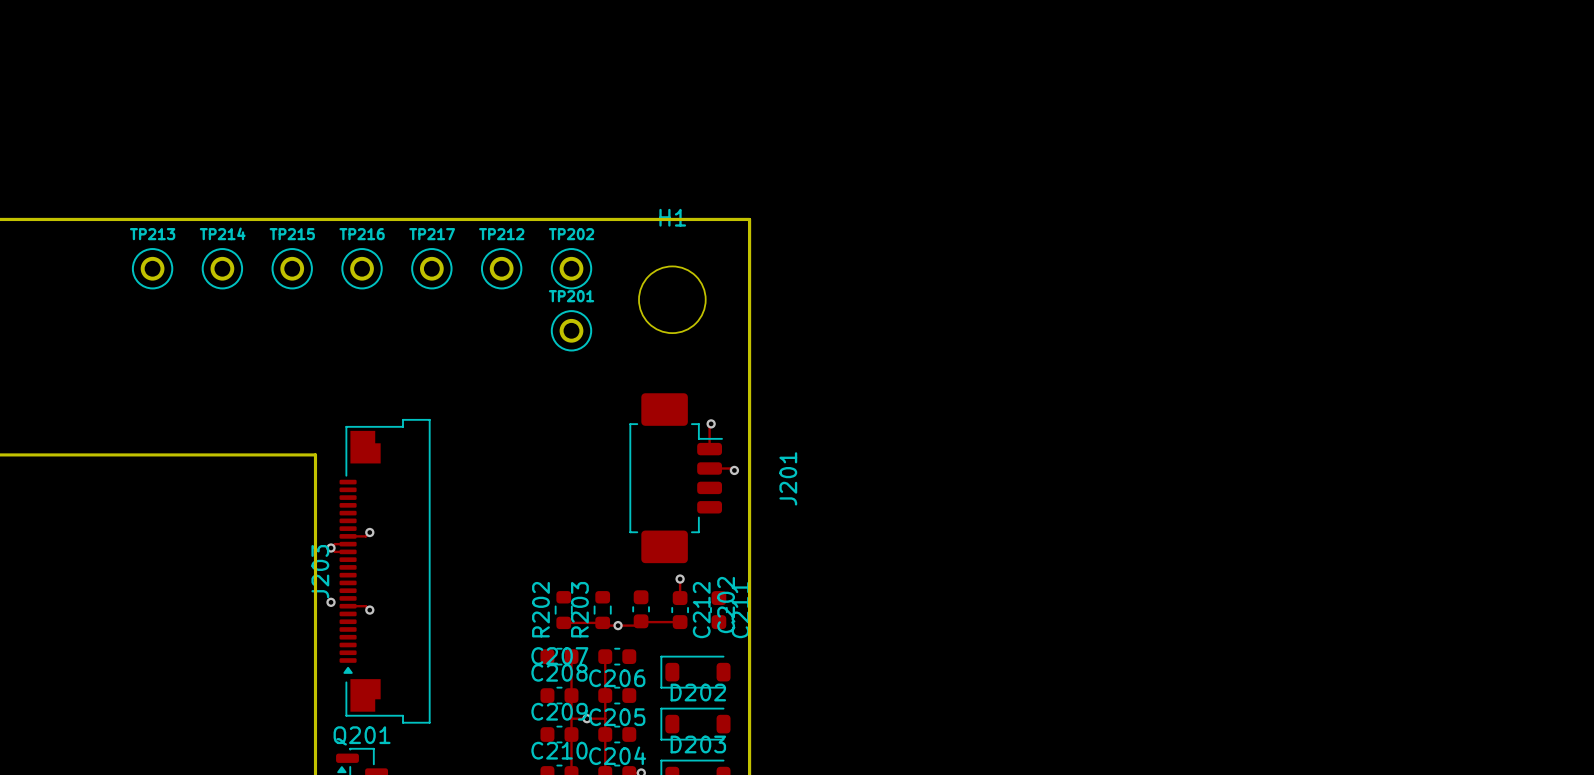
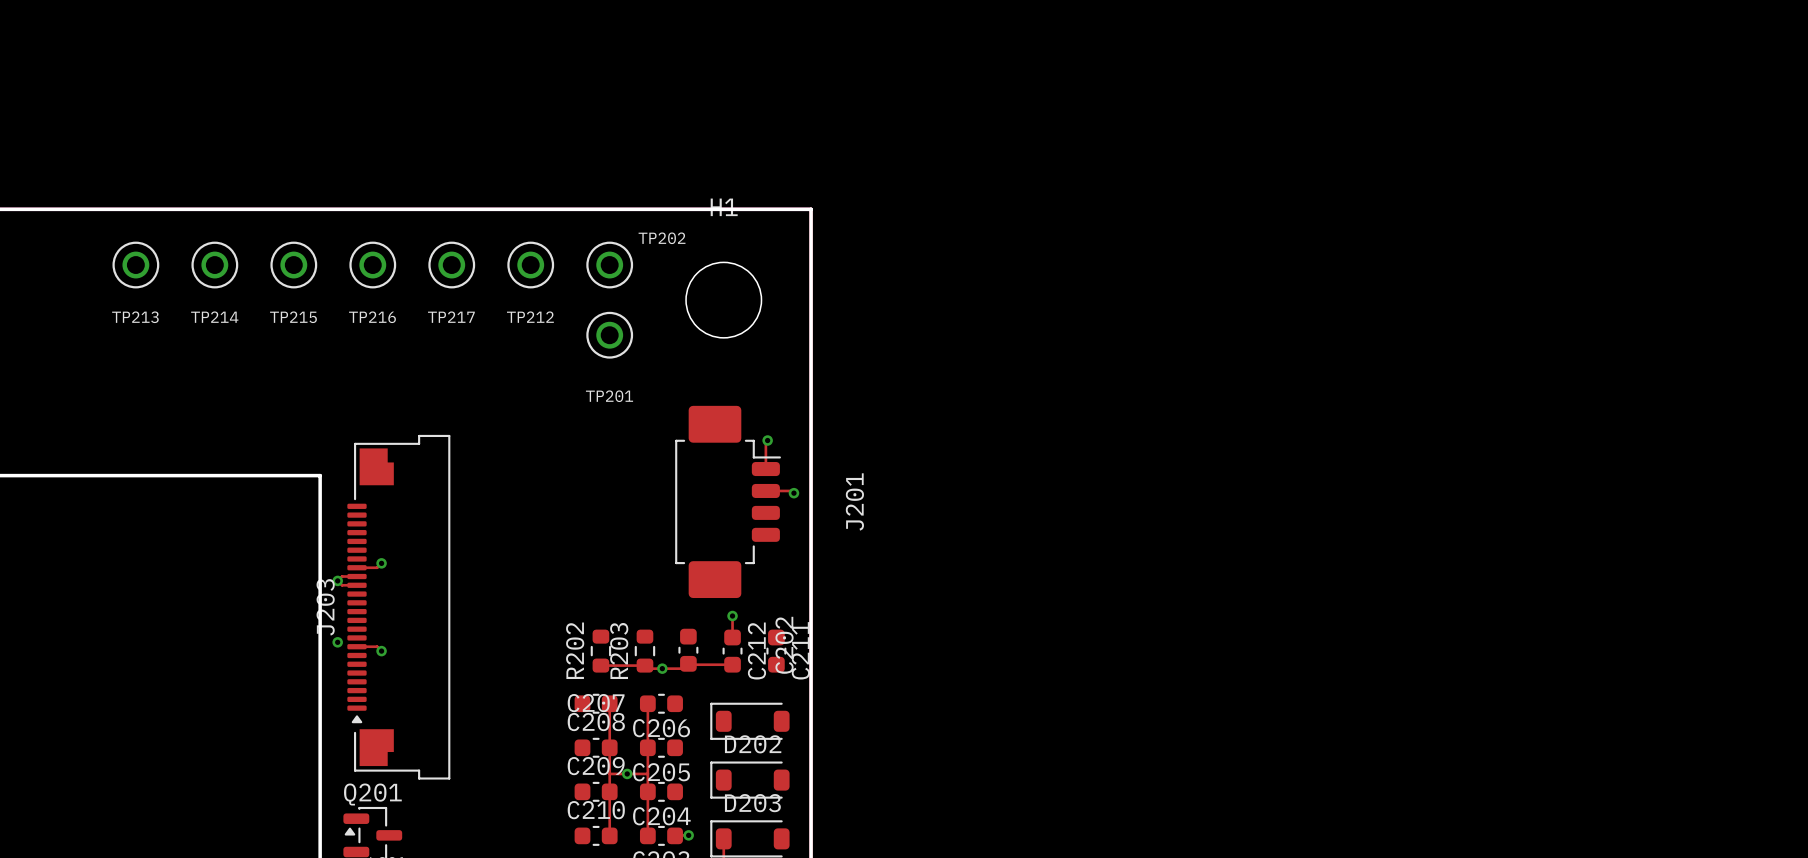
TP214 name position: TP214 (222, 233) -> TP214 (214, 317)
TP213 name position: TP213 (152, 234) -> TP213 (135, 317)
TP215 name position: TP215 (292, 234) -> TP215 (293, 317)
TP216 name position: TP216 (362, 234) -> TP216 (372, 317)
TP217 name position: TP217 (432, 234) -> TP217 (451, 317)
TP212 name position: TP212 (501, 234) -> TP212 (530, 317)
TP202 name position: TP202 (571, 234) -> TP202 (662, 238)
TP201 name position: TP201 (571, 296) -> TP201 (609, 396)

